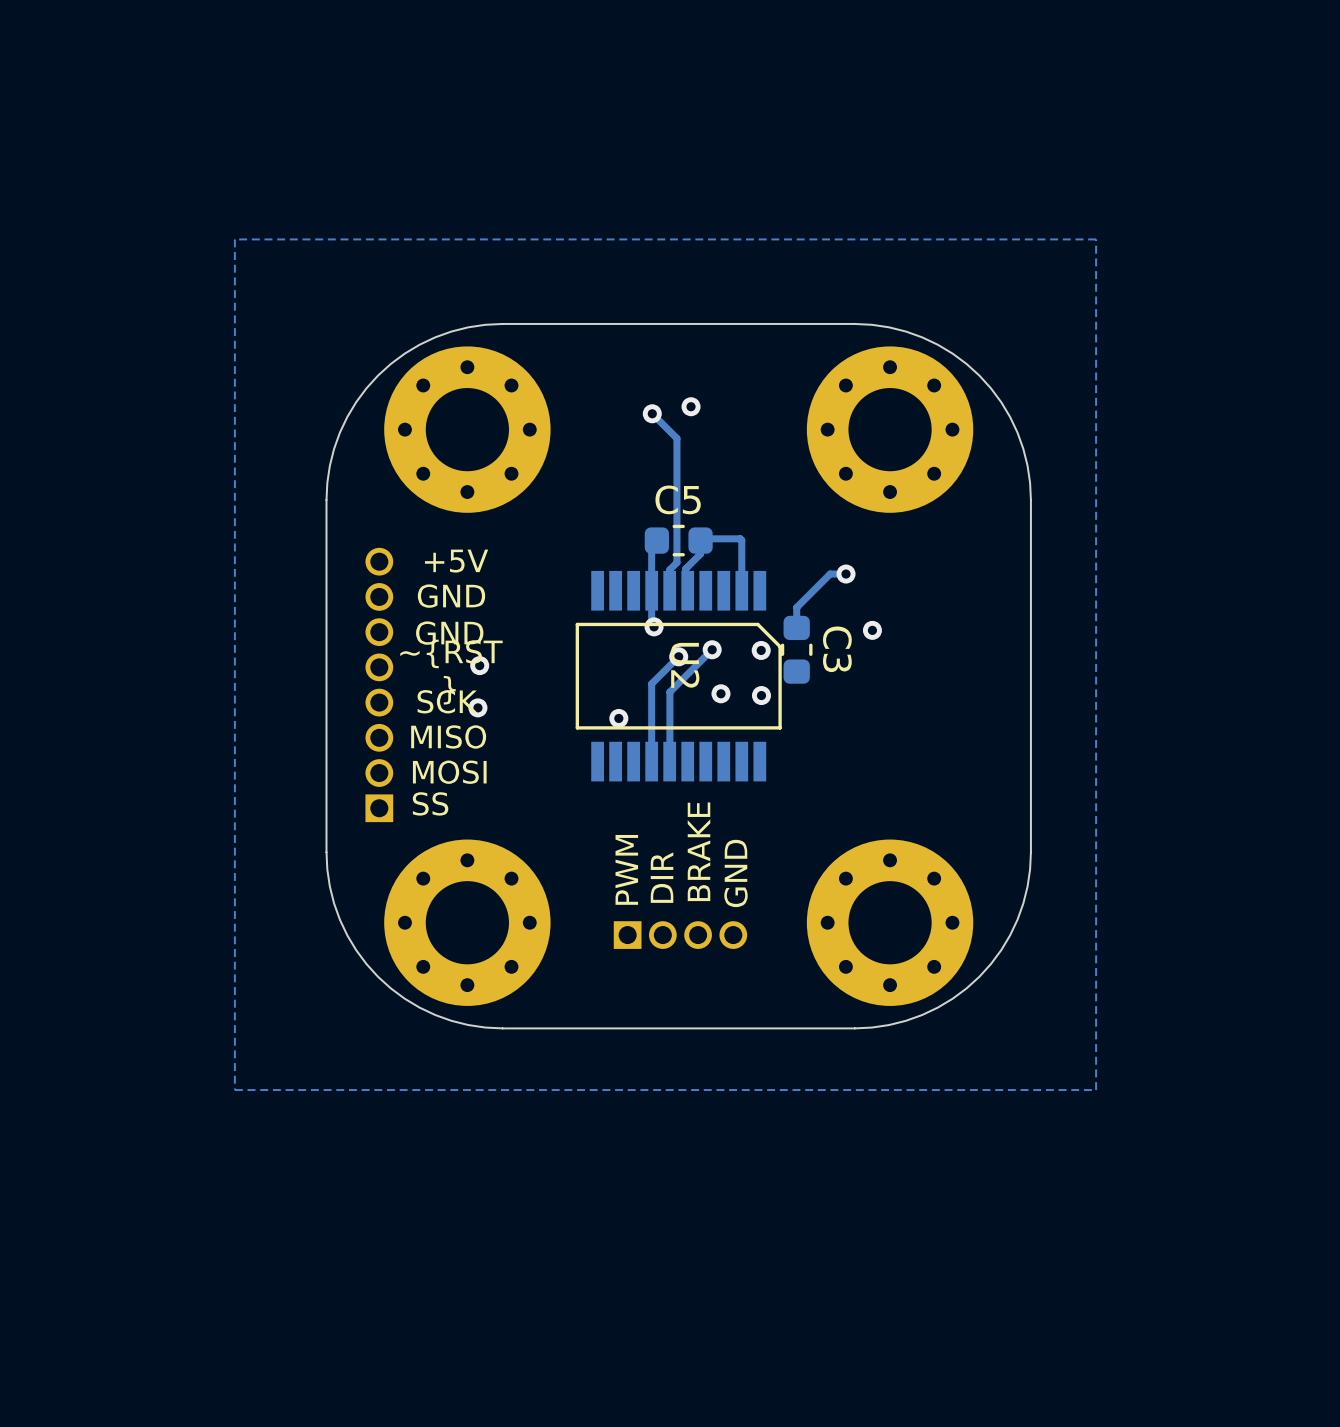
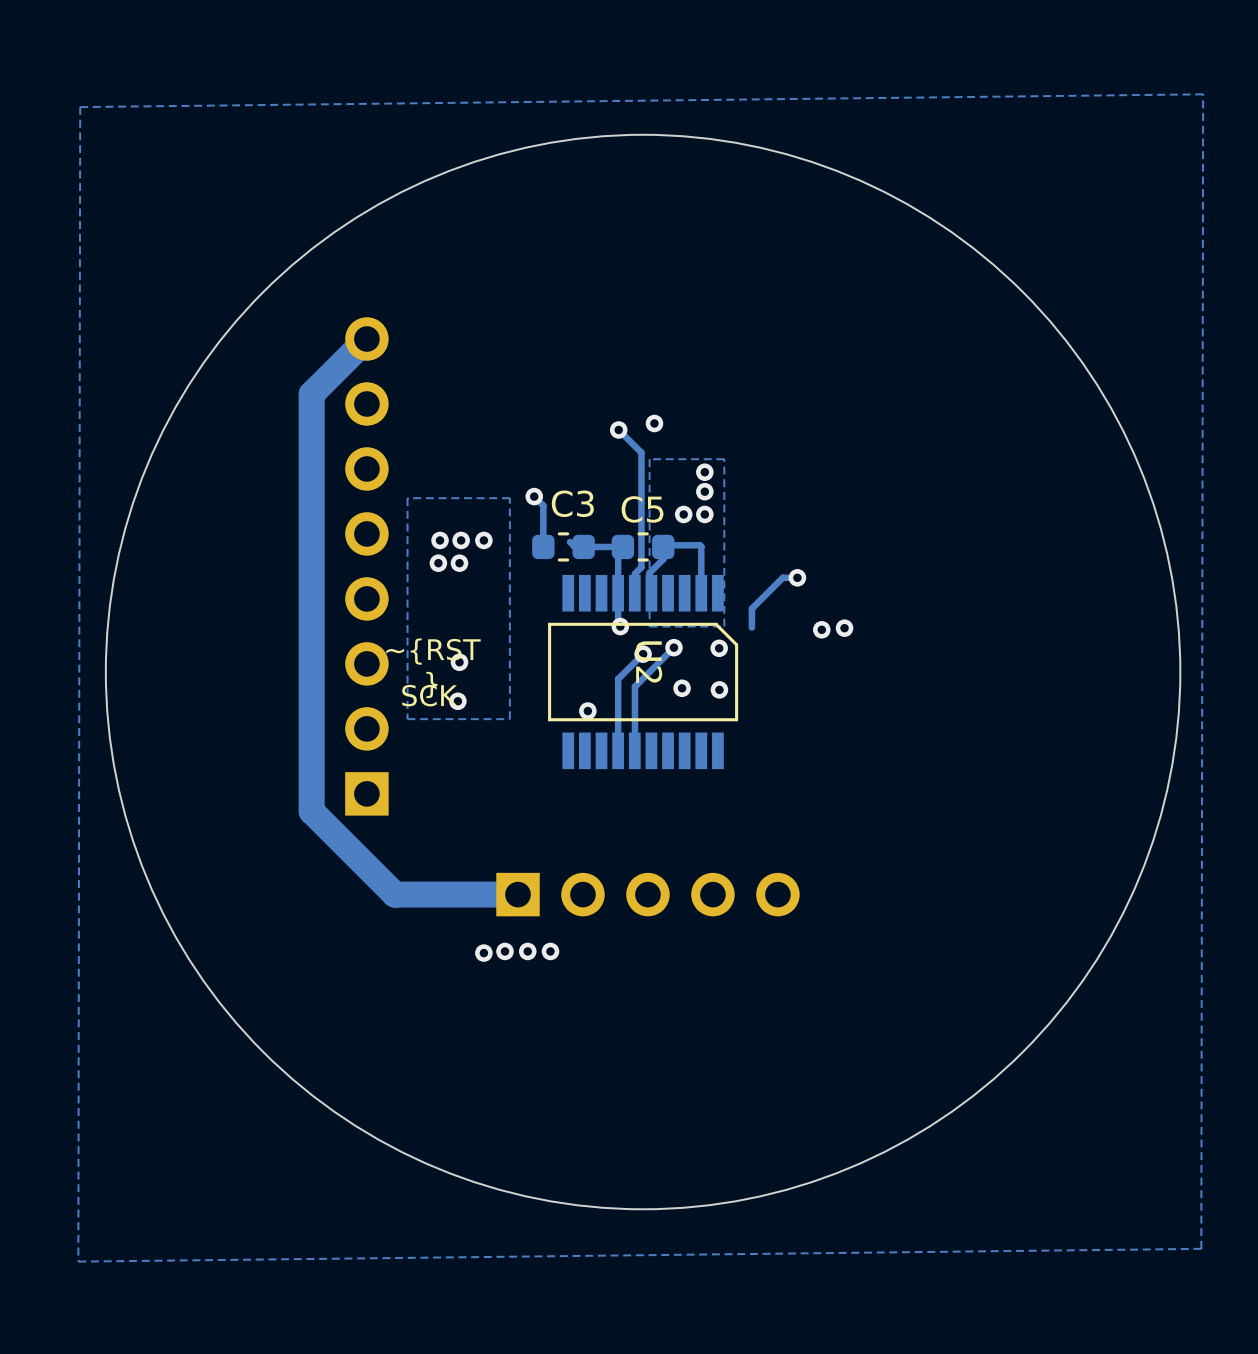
zone outline: none -> (1203, 94) (1201, 1248) (78, 1261) (80, 107) (1203, 94)
round board edge: none -> [105, 134, 1181, 1210]
zone outline: (1096, 239) (1096, 1090) (234, 1090) (234, 239) (1096, 239) -> none
track: none -> (366, 339) (311, 394) (311, 811) (394, 894) (518, 894)
board edge: (854, 323) (502, 323) (468, 327) (435, 337) (404, 353) (378, 375) (356, 402) (347, 417) (334, 448) (327, 482) (327, 869) (334, 903) (347, 935) (356, 950) (378, 976) (404, 998) (419, 1007) (451, 1020) (485, 1027) (872, 1027) (905, 1020) (937, 1007) (952, 998) (979, 976) (1001, 950) (1010, 935) (1023, 903) (1030, 869) (1030, 500) (1027, 465) (1017, 432) (1001, 402) (990, 388) (966, 363) (937, 344) (905, 331) (889, 327) (854, 323) -> none
part: (467, 429) -> none
part: (890, 429) -> none
zone outline: none -> (724, 459) (724, 626) (649, 626) (649, 459) (724, 459)
via: none -> (704, 472)
via: none -> (704, 491)
track: none -> (534, 496) (543, 505) (543, 546)
via: none -> (534, 496)
zone outline: none -> (509, 498) (509, 719) (407, 719) (407, 498) (509, 498)
via: none -> (683, 514)
via: none -> (704, 514)
via: none -> (440, 540)
via: none -> (461, 540)
via: none -> (483, 540)
track: none -> (569, 542) (574, 546) (621, 546)
via: none -> (438, 563)
via: none -> (459, 563)
part: none -> (366, 566)
text: +5V (456, 561) -> none
text: GND (451, 596) -> none
via: none -> (844, 628)
text: GND (449, 633) -> none
C3 rotation: 0° (796, 649) -> 90° clockwise (563, 546)
C3 position: (796, 649) -> (563, 546)
part: (379, 684) -> none
text: MISO (448, 736) -> none
text: MOSI (449, 772) -> none
text: SS (430, 803) -> none
text: BRAKE (699, 851) -> none
text: PWM (626, 869) -> none
text: GND (736, 873) -> none
text: DIR (662, 877) -> none
part footprint: [613, 921, 748, 949] -> [496, 872, 800, 917]
part: (467, 922) -> none
part: (890, 922) -> none
via: none -> (505, 951)
via: none -> (527, 951)
via: none -> (550, 951)
via: none -> (483, 953)

